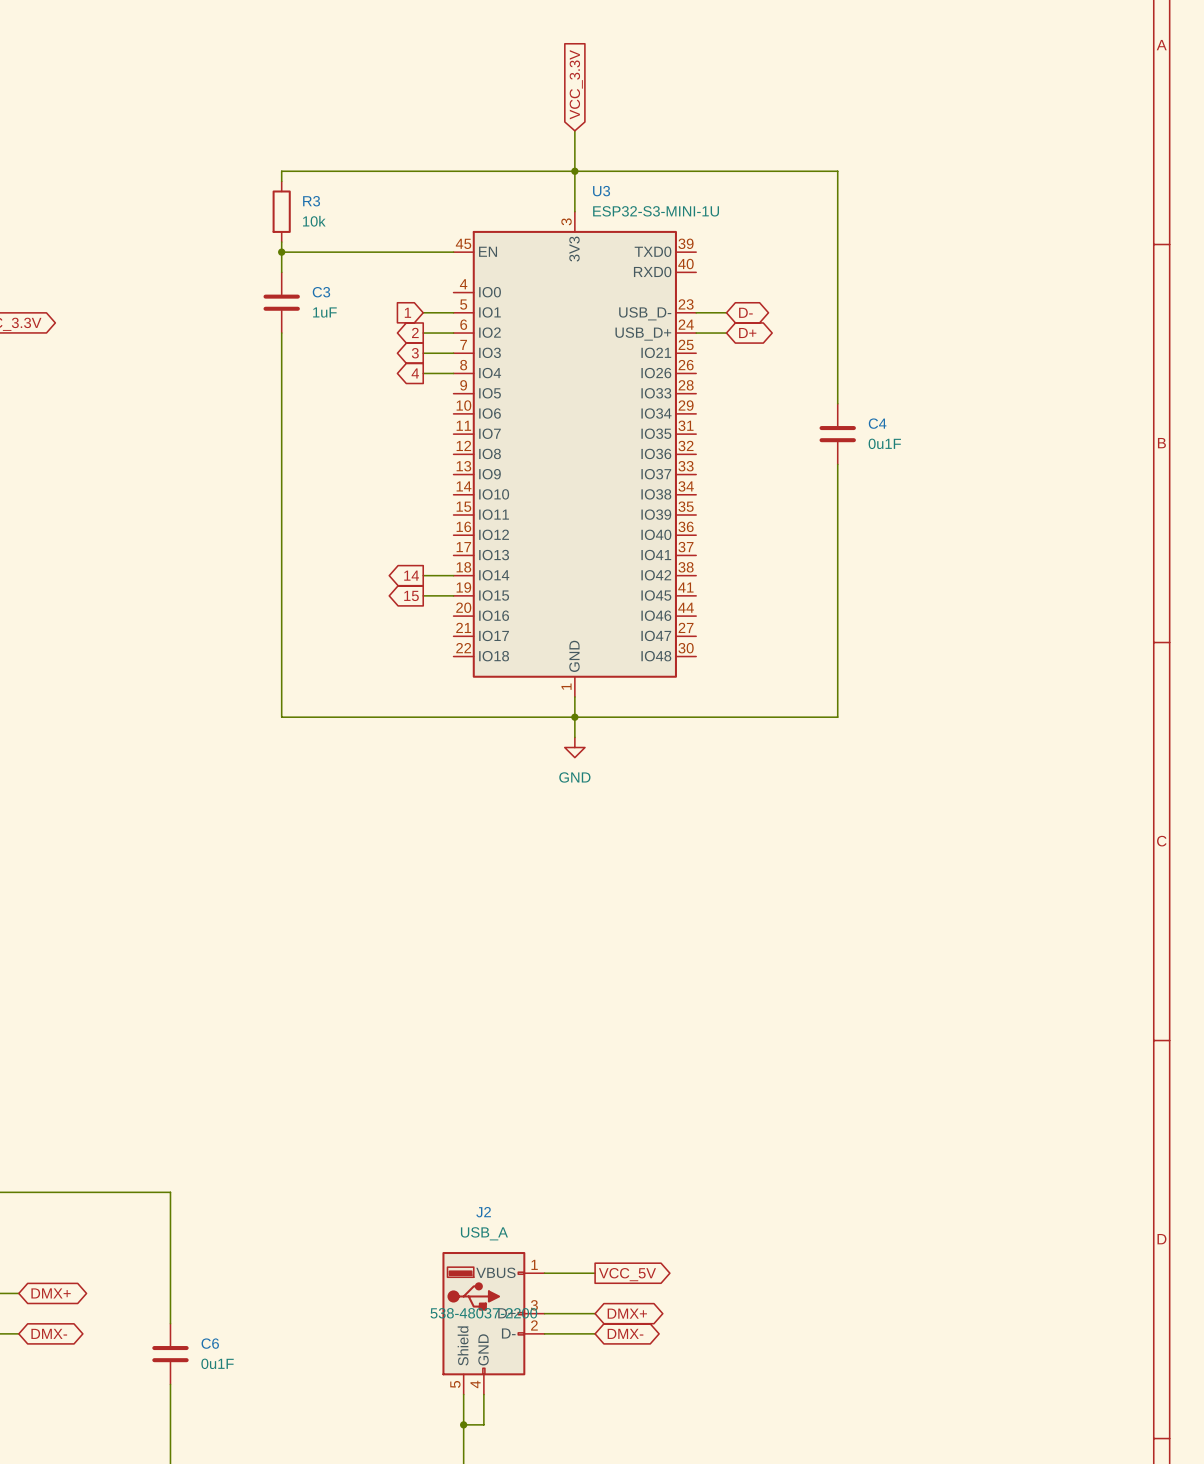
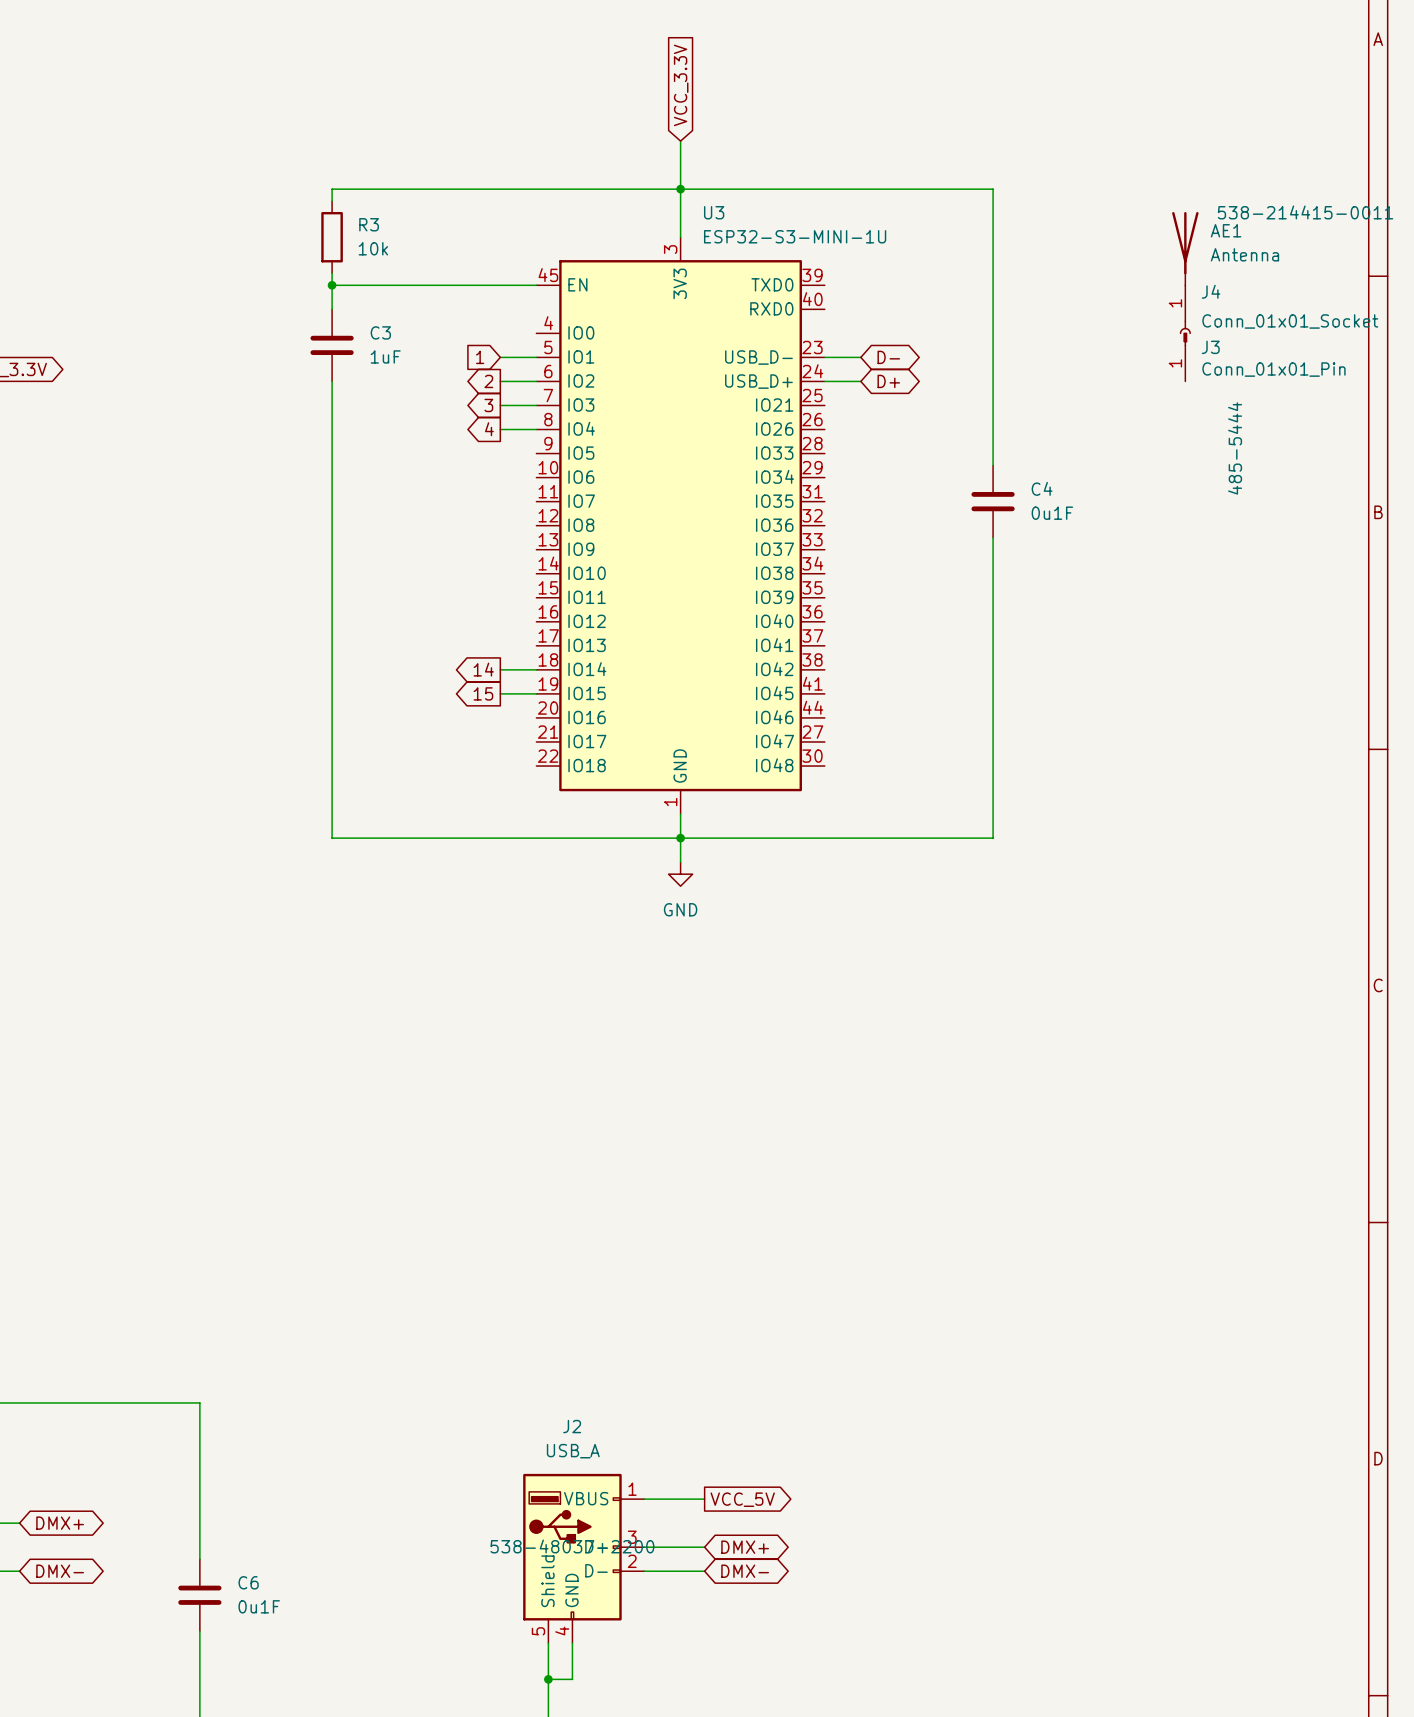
AE1: none -> Antenna (1185, 248)
J4: none -> Conn_01x01_Socket (1185, 309)
J3: none -> Conn_01x01_Pin (1185, 357)

